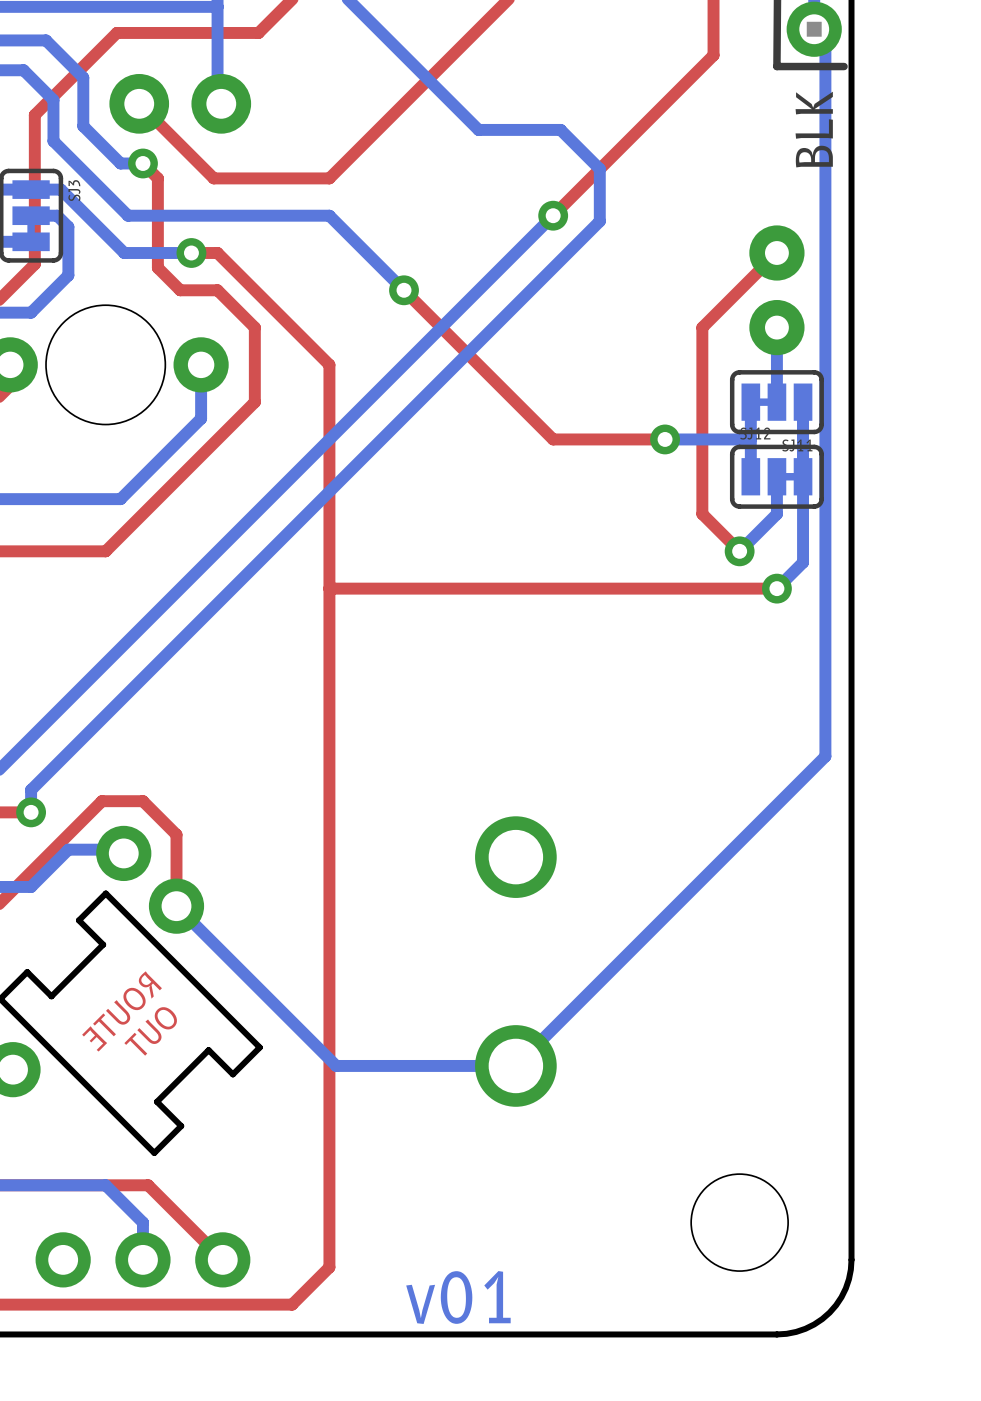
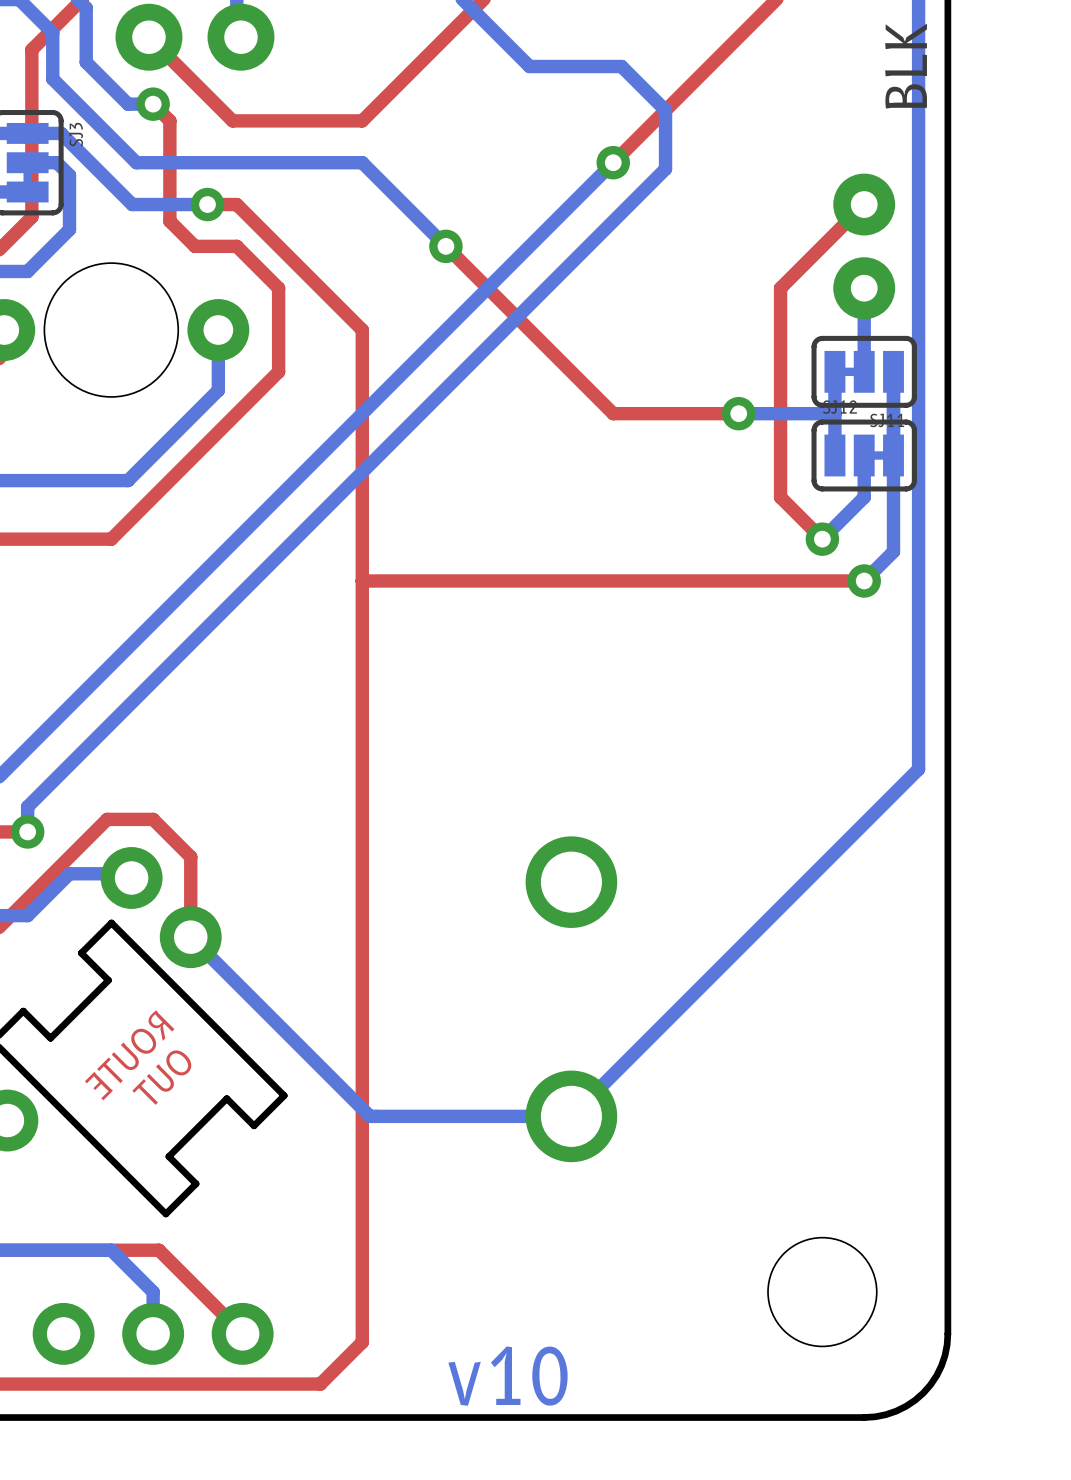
text: v01 (458, 1297) -> v10 (508, 1376)

